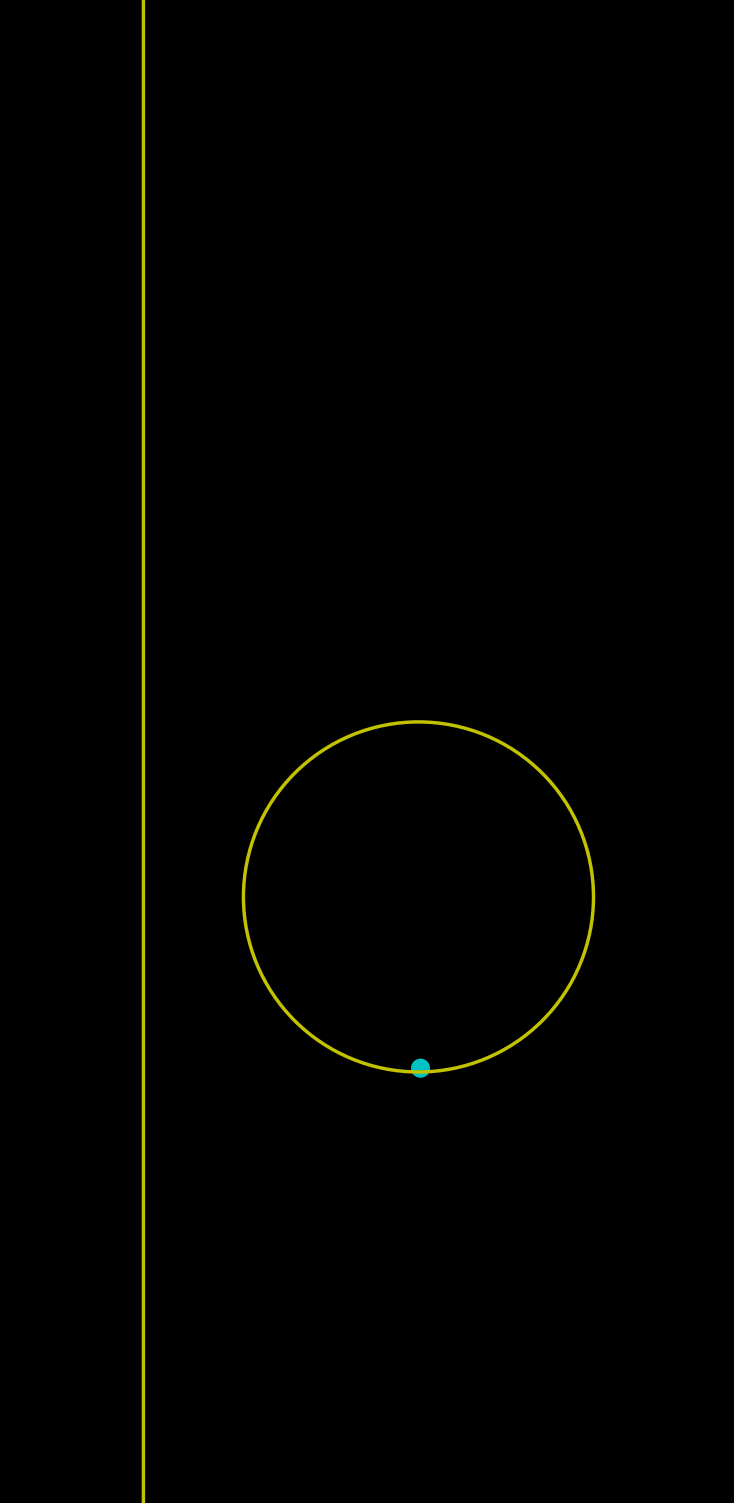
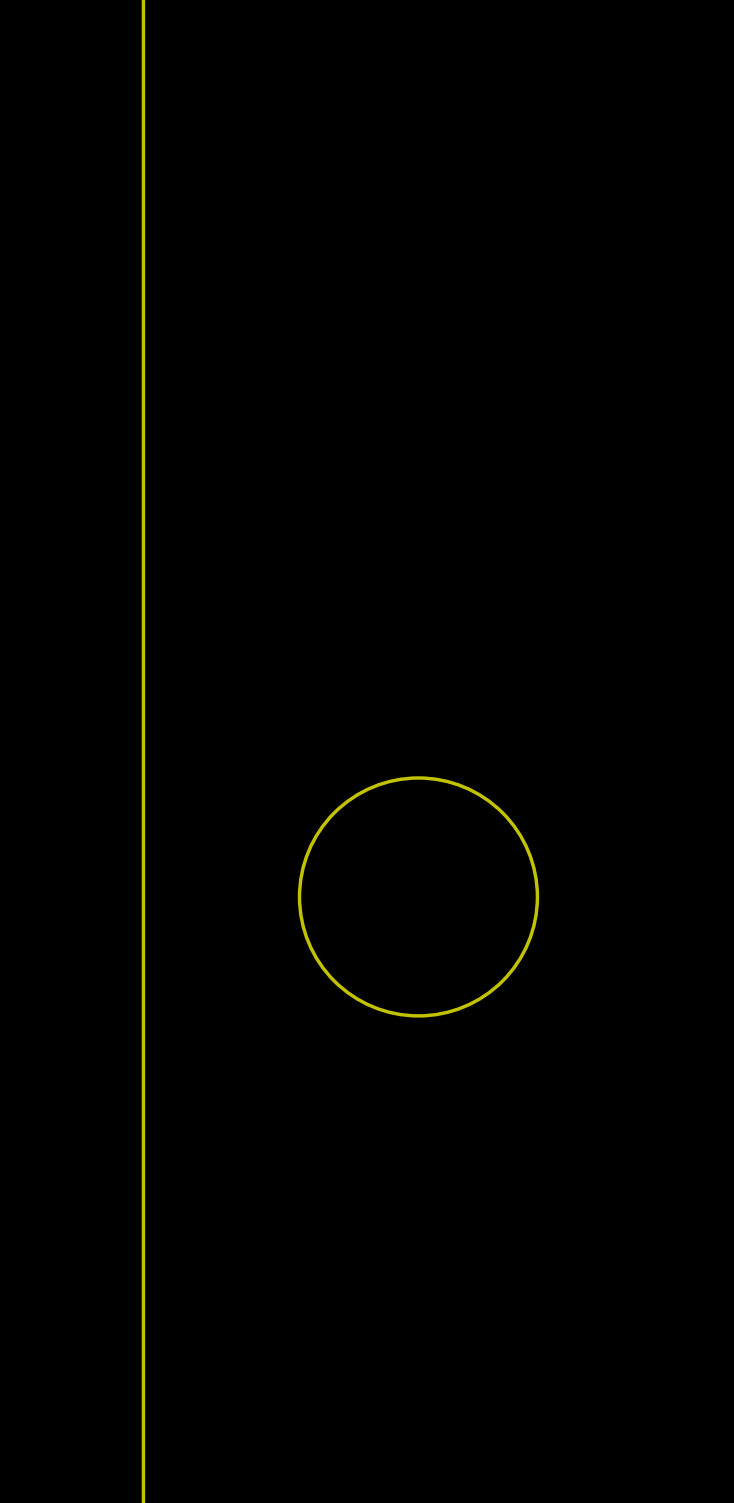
round board edge size: [241, 720, 596, 1074] -> [297, 776, 540, 1018]

